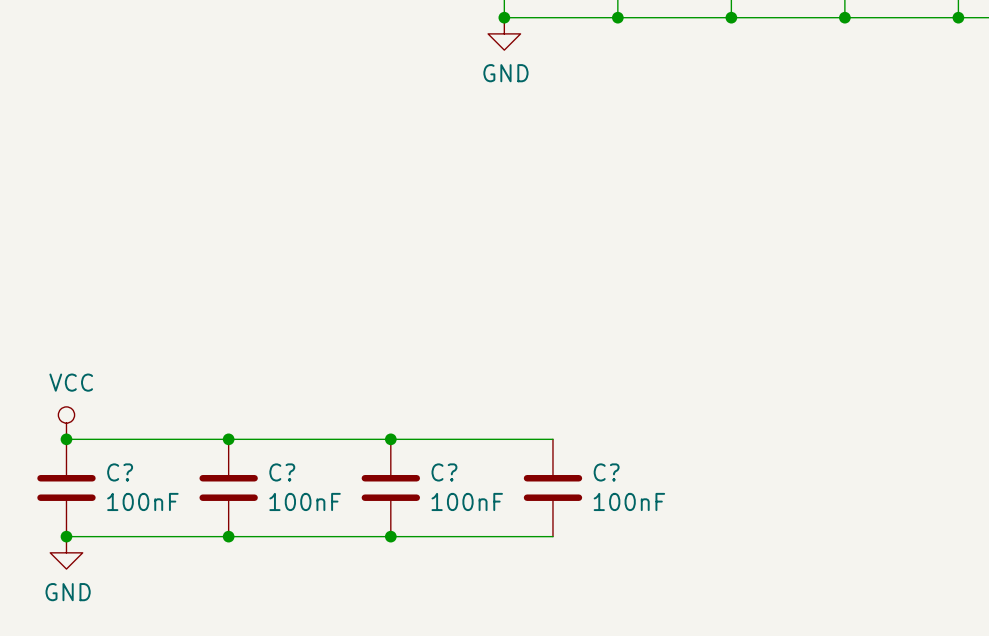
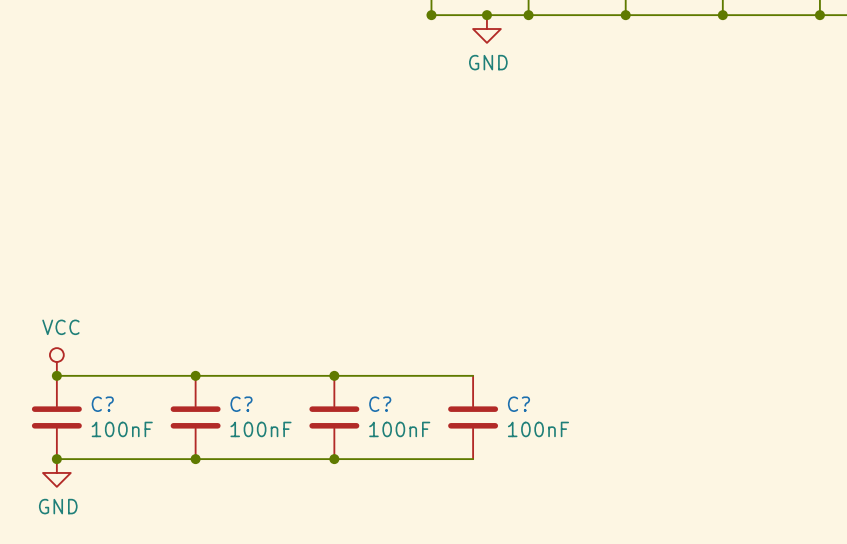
junction: none -> (486, 15)
power symbol position: GND (504, 33) -> GND (486, 29)

